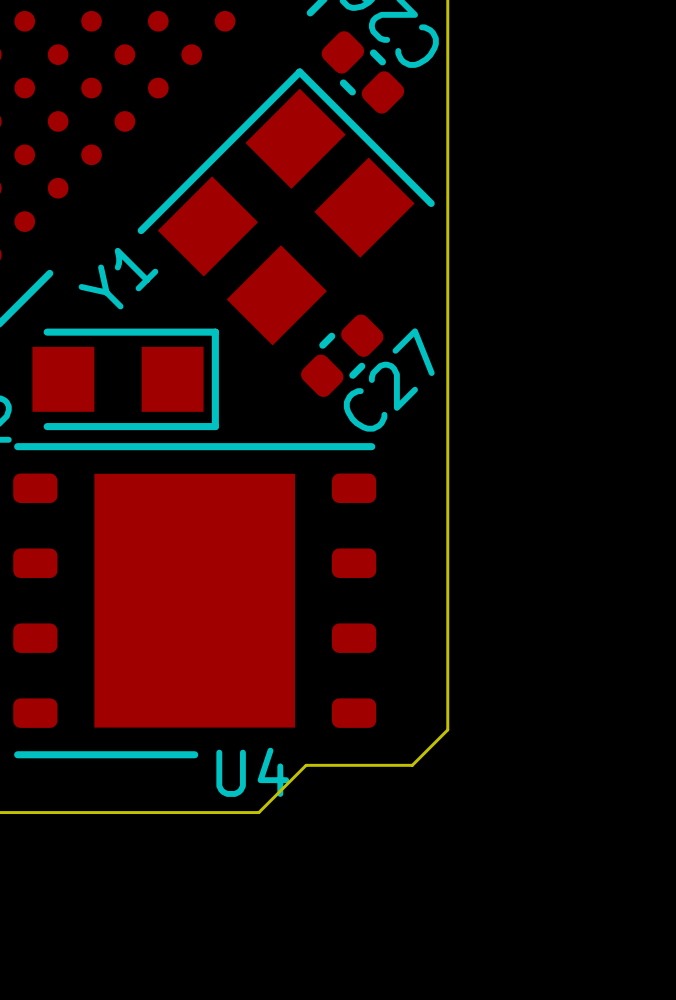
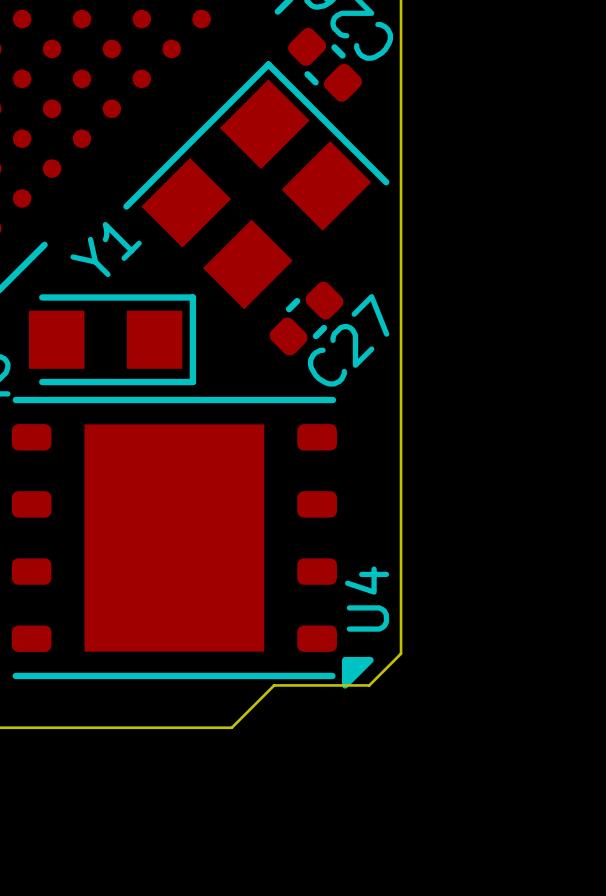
U4 footprint: [13, 443, 377, 759] -> [11, 396, 374, 689]
U4 name position: U4 (252, 772) -> U4 (367, 599)

